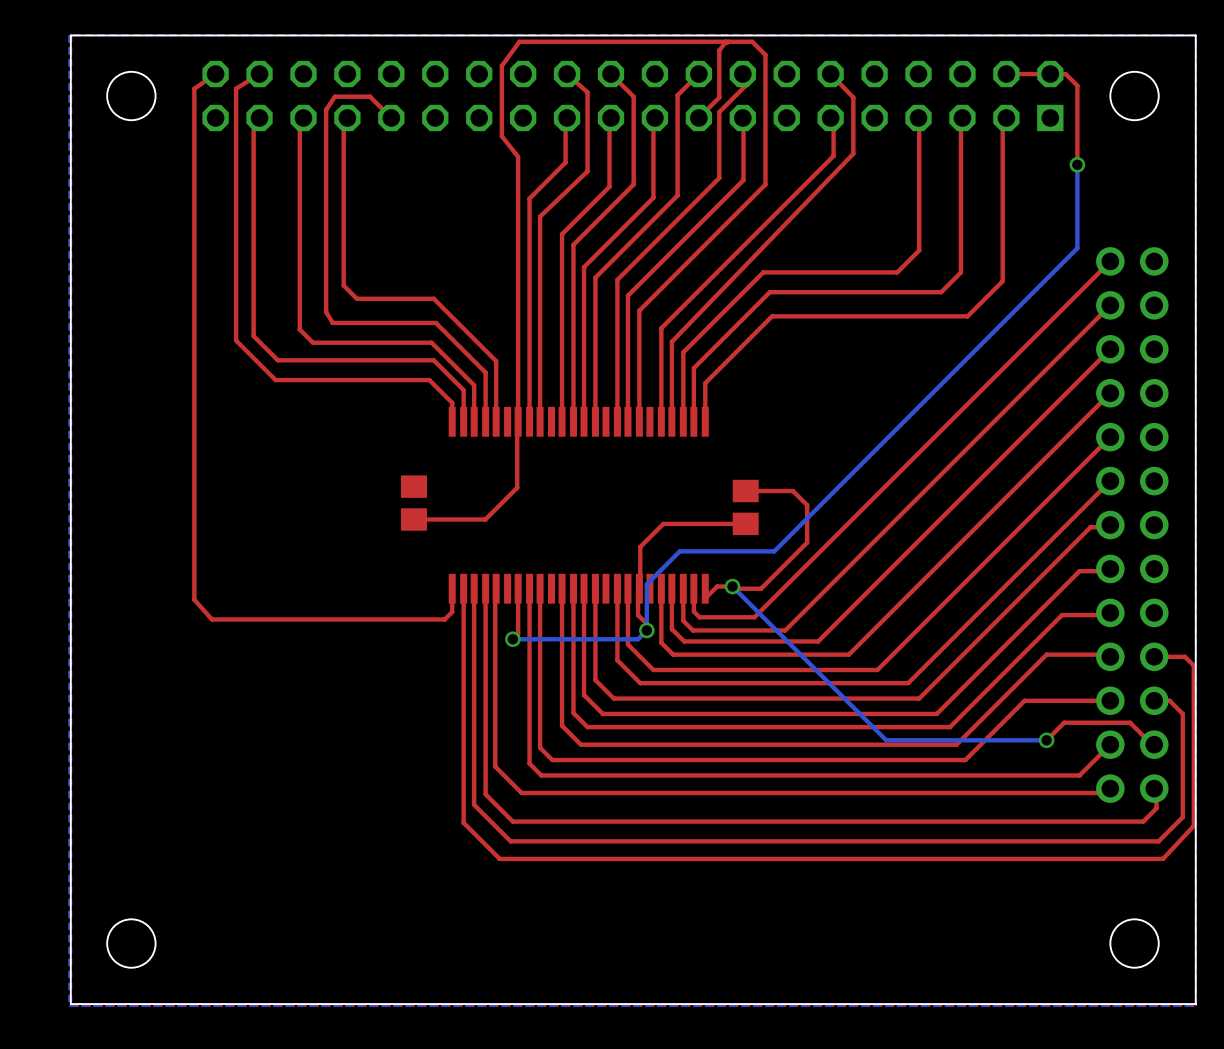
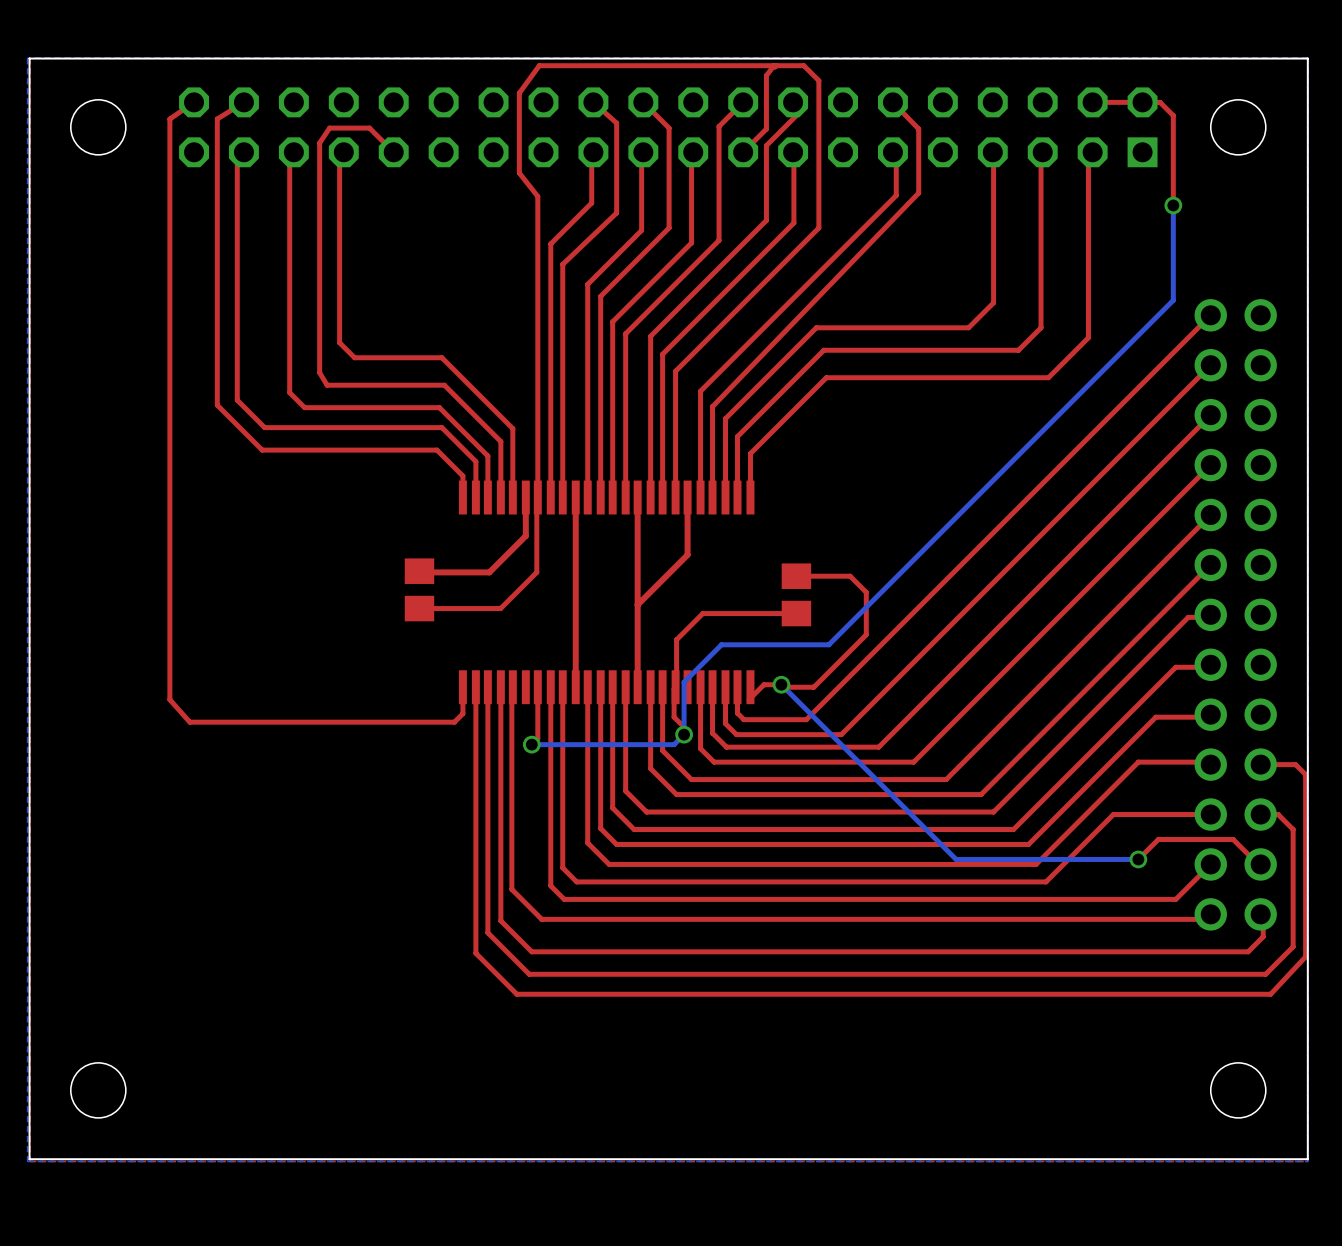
top track: none -> (525, 497) (525, 535) (489, 572) (419, 571)
top track: none -> (575, 497) (575, 687)
top track: none -> (637, 497) (637, 687)
top track: none -> (687, 497) (687, 554) (637, 604)

